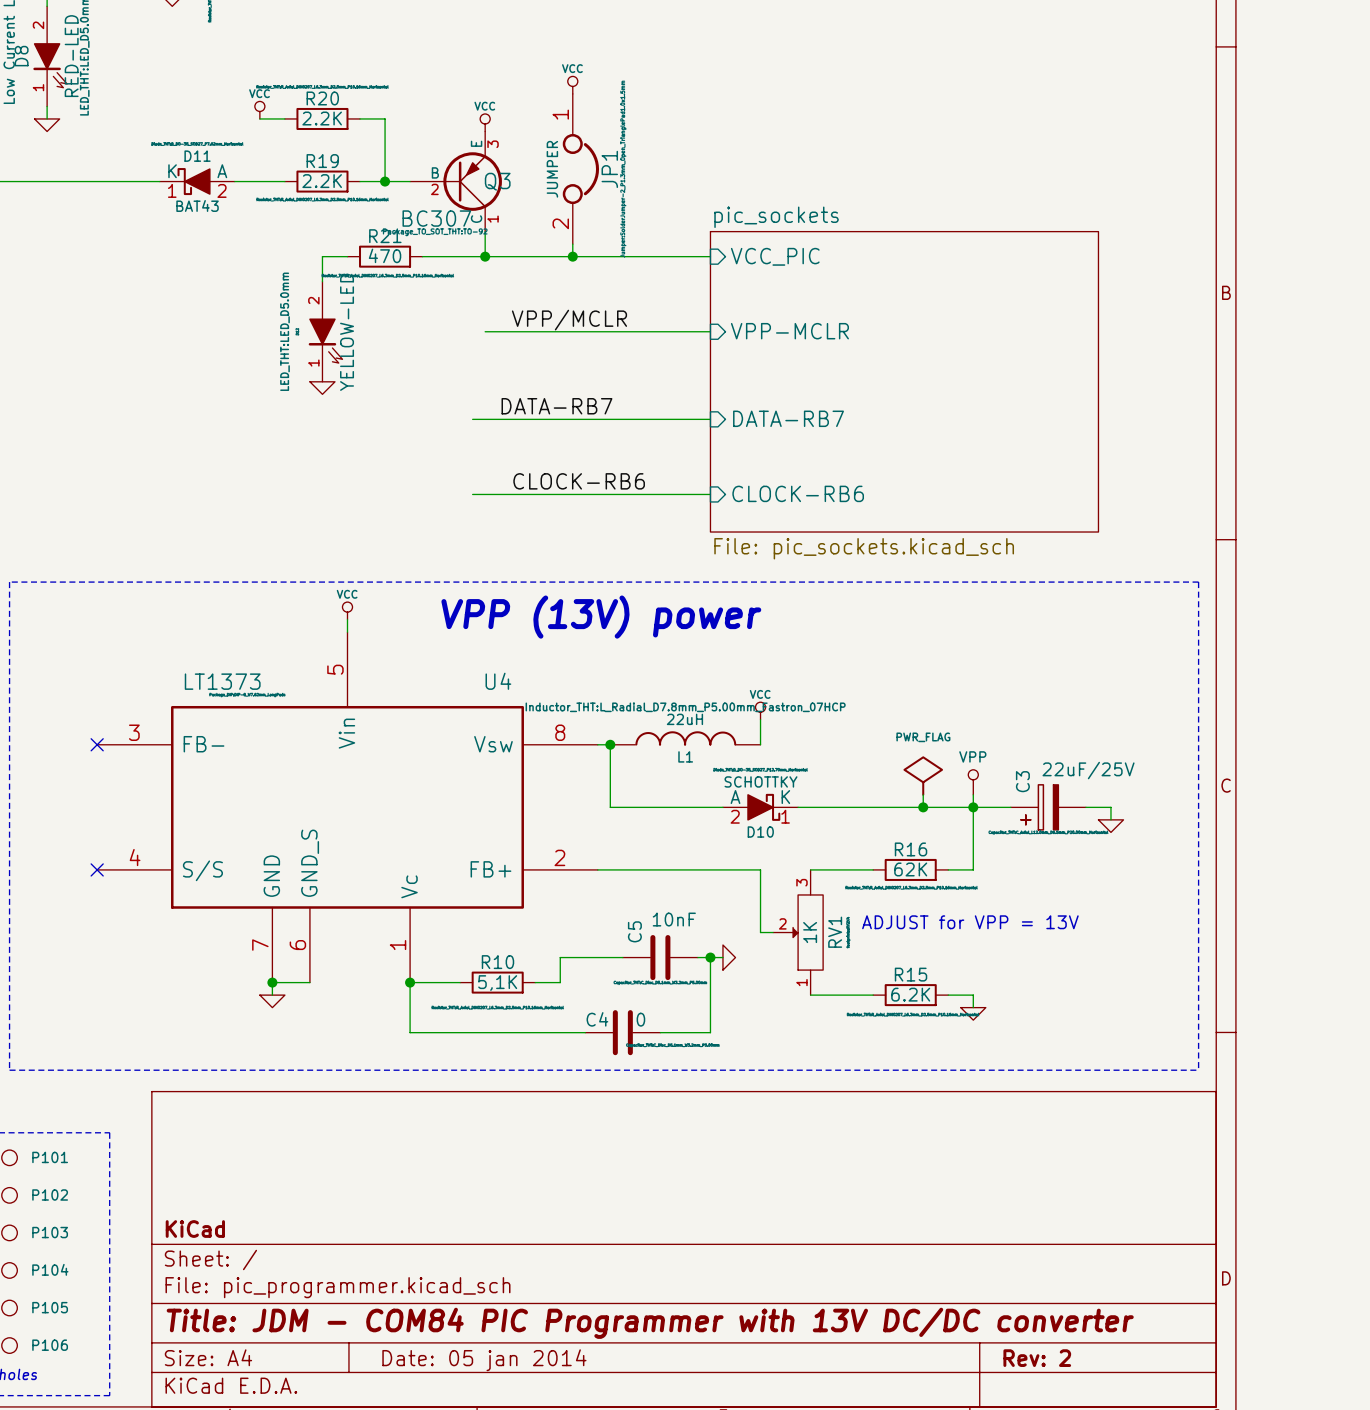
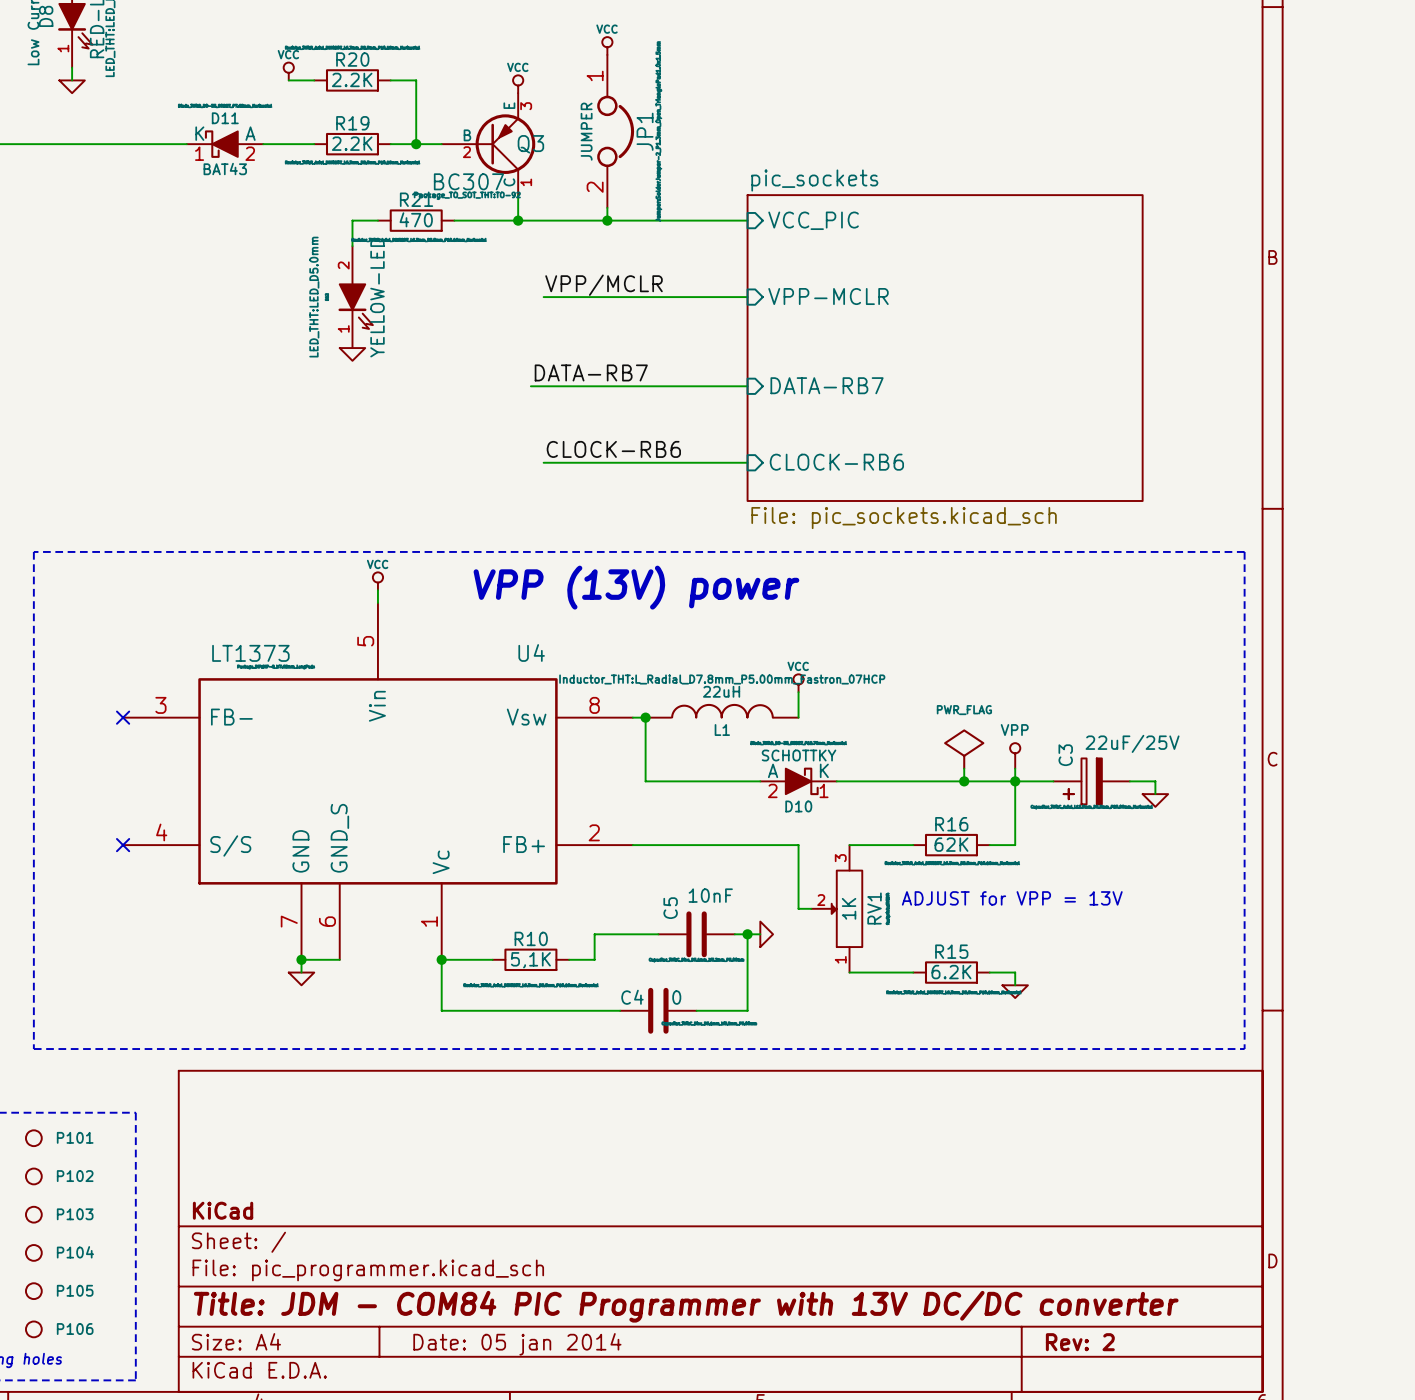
wire: (485, 331) (510, 331) -> none
wire: (472, 419) (497, 419) -> none
wire: (472, 494) (510, 494) -> none

